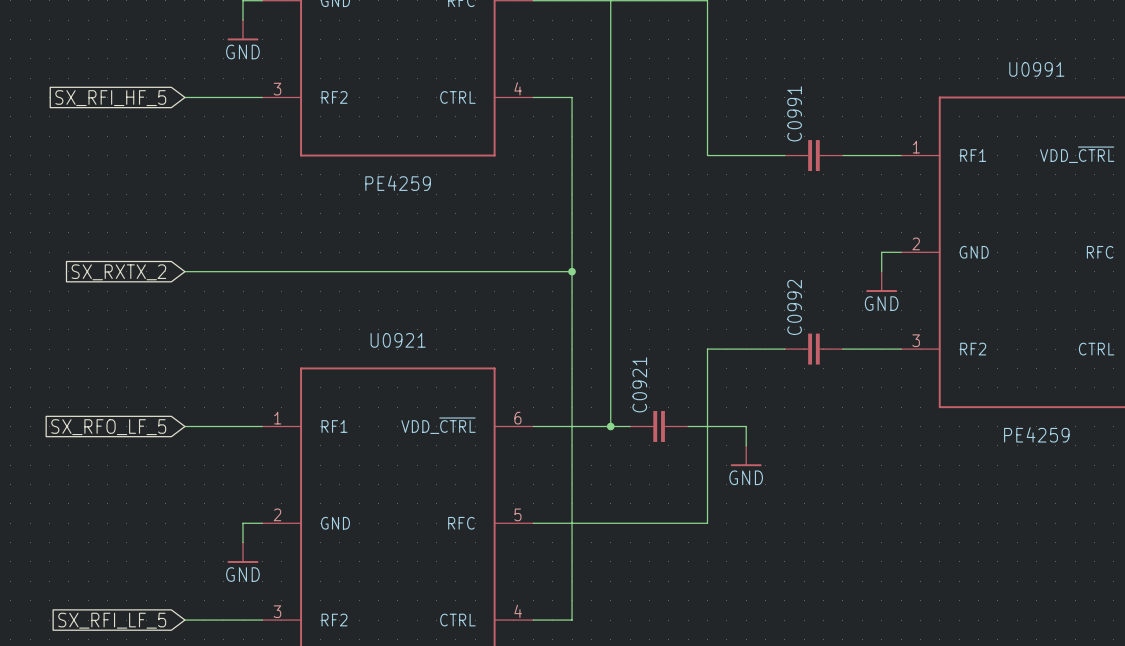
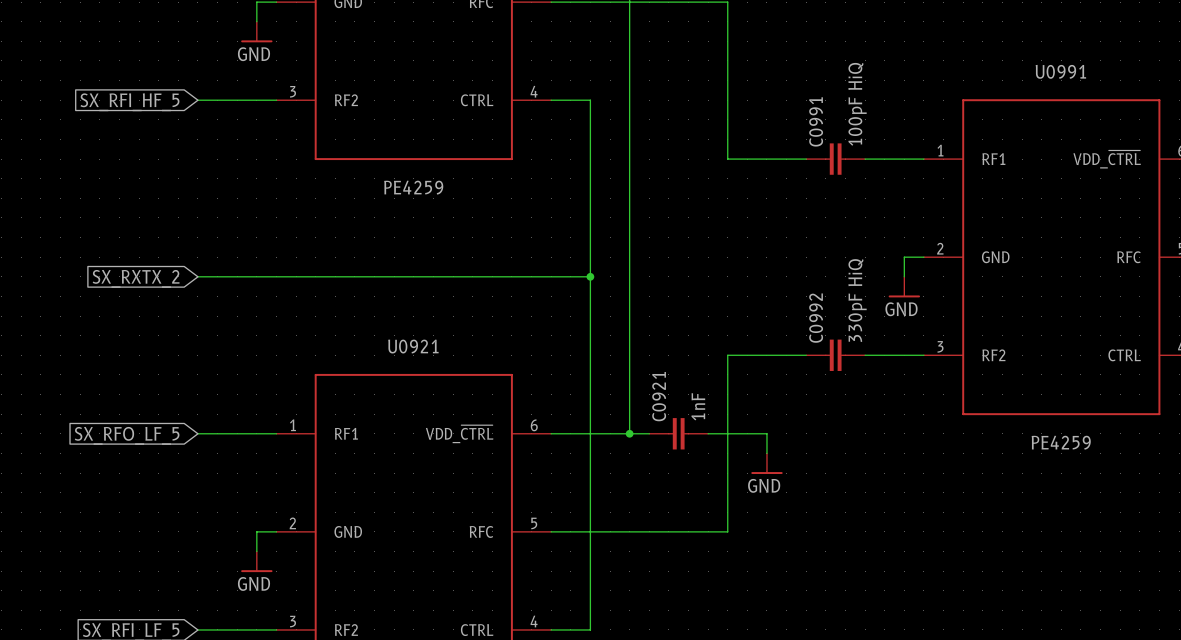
C0991 value: none -> 100pF HiQ (857, 104)
C0992 value: none -> 330pF HiQ (857, 300)
C0921 value: none -> 1nF (698, 406)

